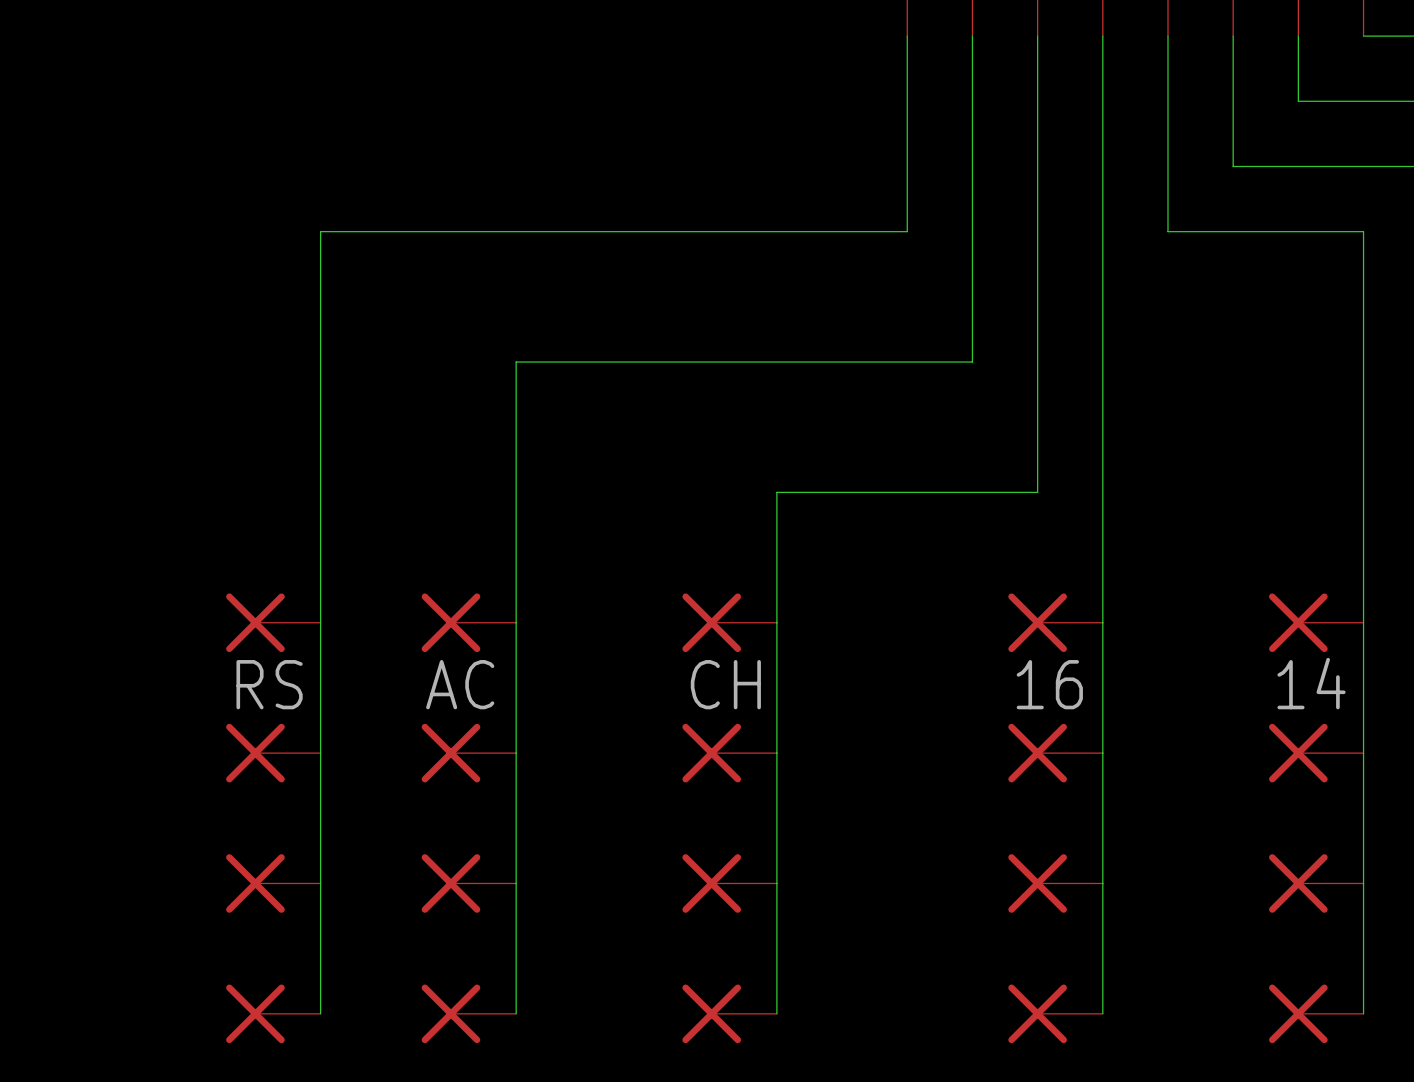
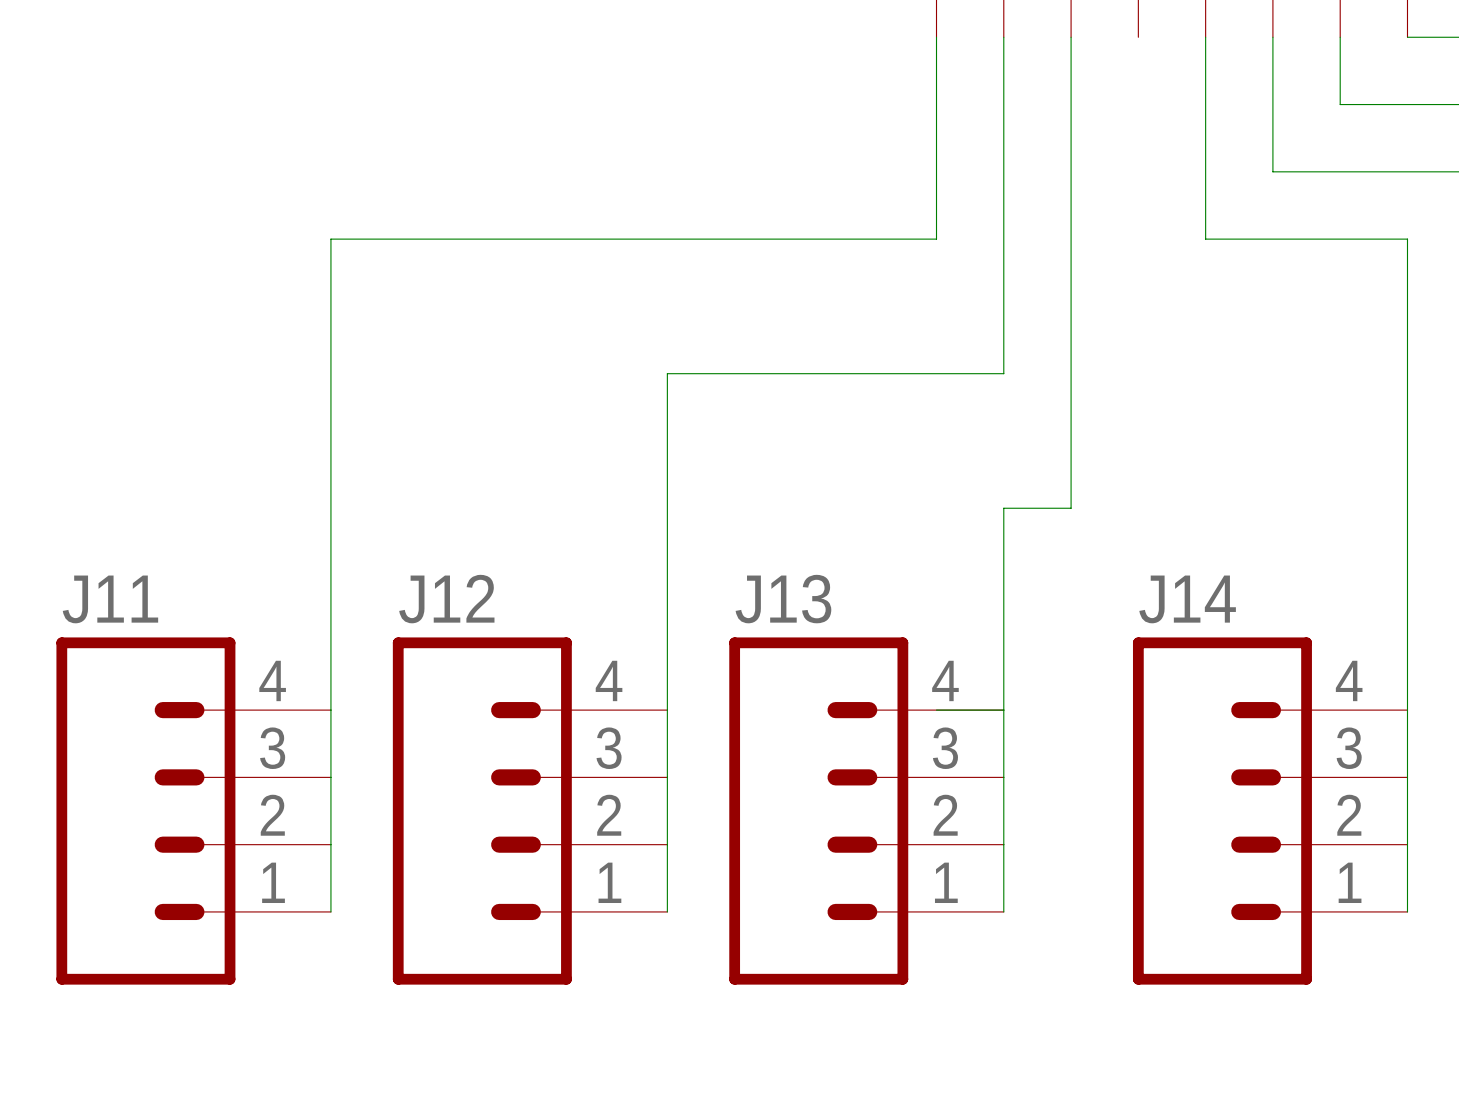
wire: (1102, 36) (1102, 1013) -> none
wire: (646, 362) (516, 362) (516, 1013) -> (667, 373) (667, 911)
wire: (972, 492) (776, 492) (776, 1013) -> (1003, 508) (1003, 911)
part: RS (273, 622) -> none
part: AC (468, 622) -> none
part: CH (729, 622) -> none
part: 16 (1055, 622) -> none
part: 14 (1316, 622) -> none
wire: none -> (936, 710) (1003, 710)
part: (273, 753) -> none
part: (468, 753) -> none
part: (729, 753) -> none
part: (1055, 753) -> none
part: (1316, 753) -> none
J11: none -> (193, 811)
J12: none -> (530, 811)
J13: none -> (866, 811)
J14: none -> (1270, 811)
part: (273, 883) -> none
wire: (320, 883) (320, 1013) -> none
part: (468, 883) -> none
part: (729, 883) -> none
part: (1055, 883) -> none
part: (1316, 883) -> none
wire: (1363, 883) (1363, 1013) -> none
part: (273, 1013) -> none
part: (468, 1013) -> none
part: (729, 1013) -> none
part: (1055, 1013) -> none
part: (1316, 1013) -> none

